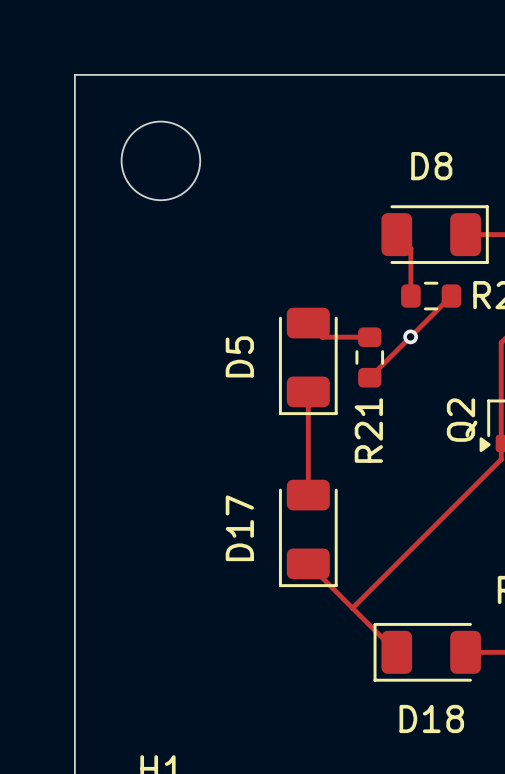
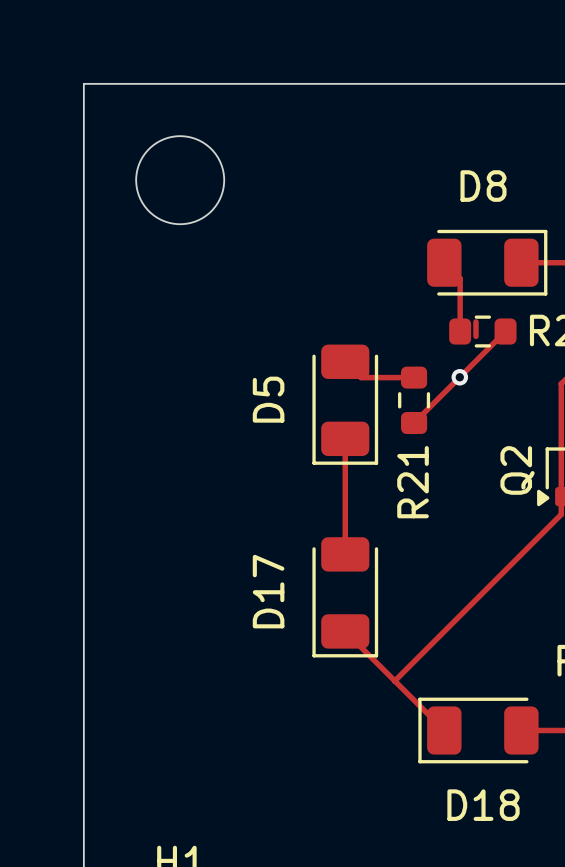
top track: none -> (475, 321) (475, 336)

